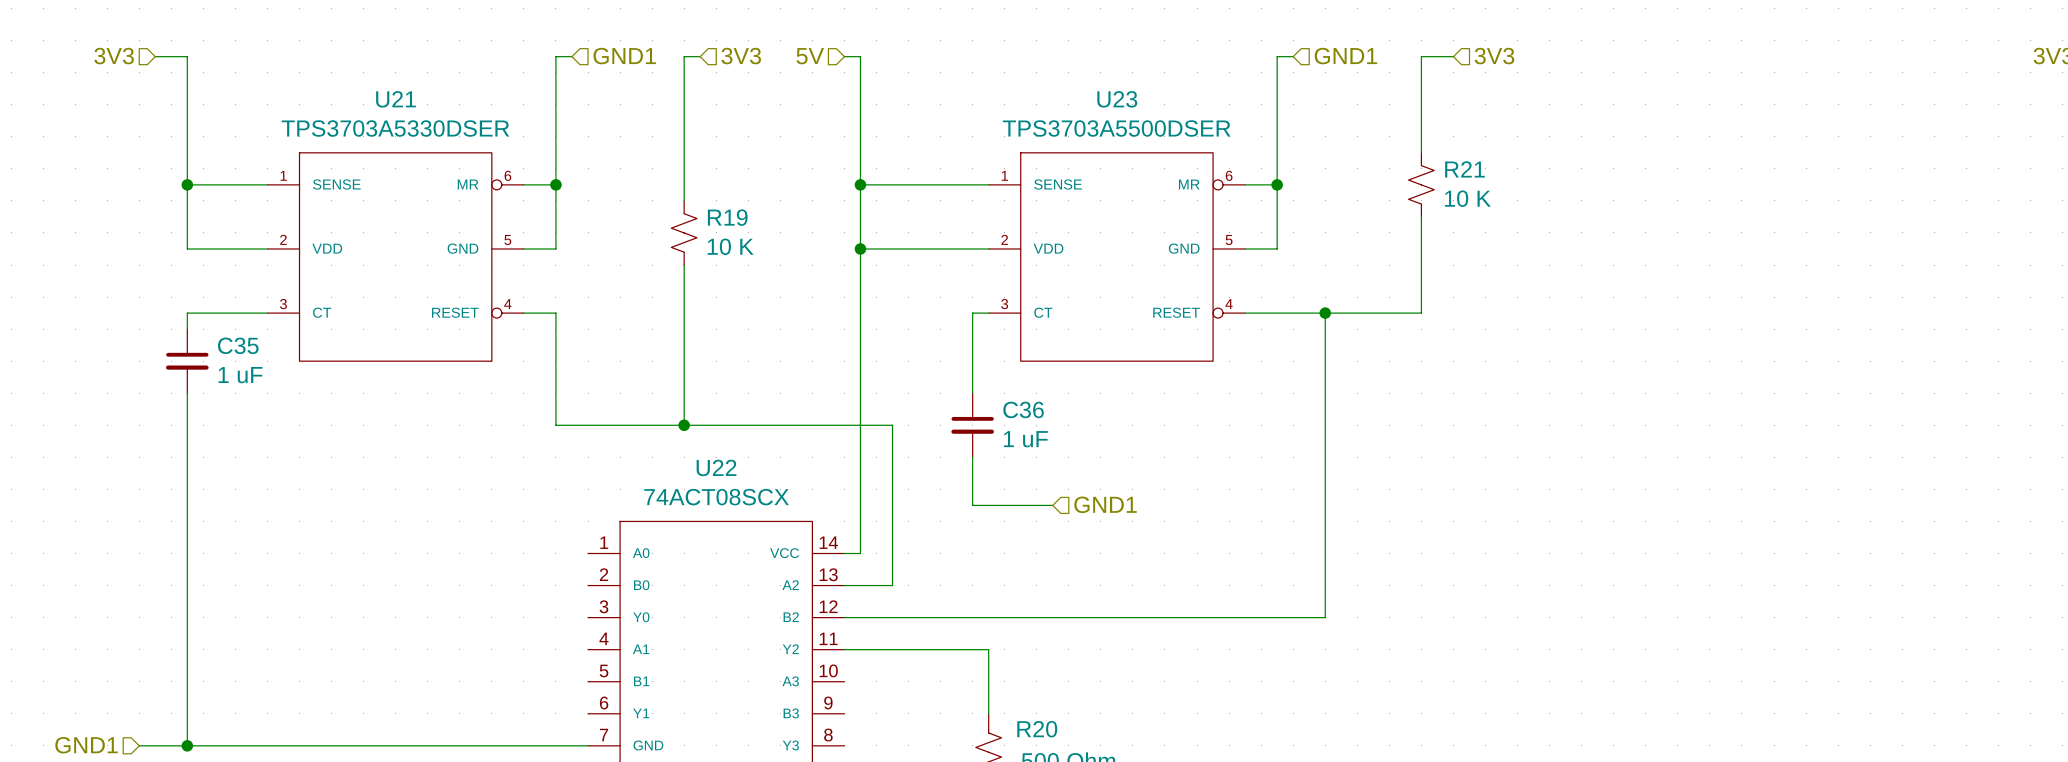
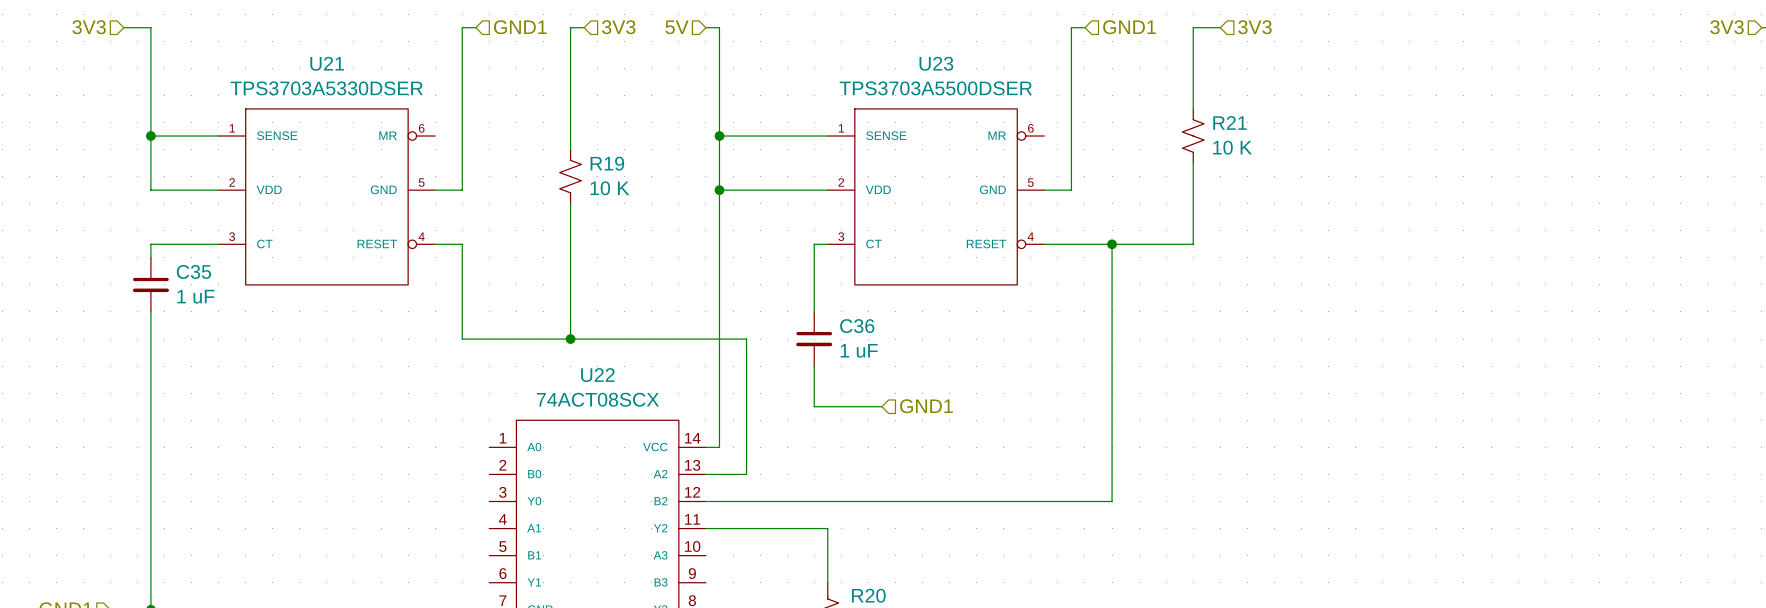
wire: (523, 184) (555, 184) -> none
junction: (555, 184) -> none
wire: (1245, 184) (1277, 184) -> none
junction: (1277, 184) -> none

